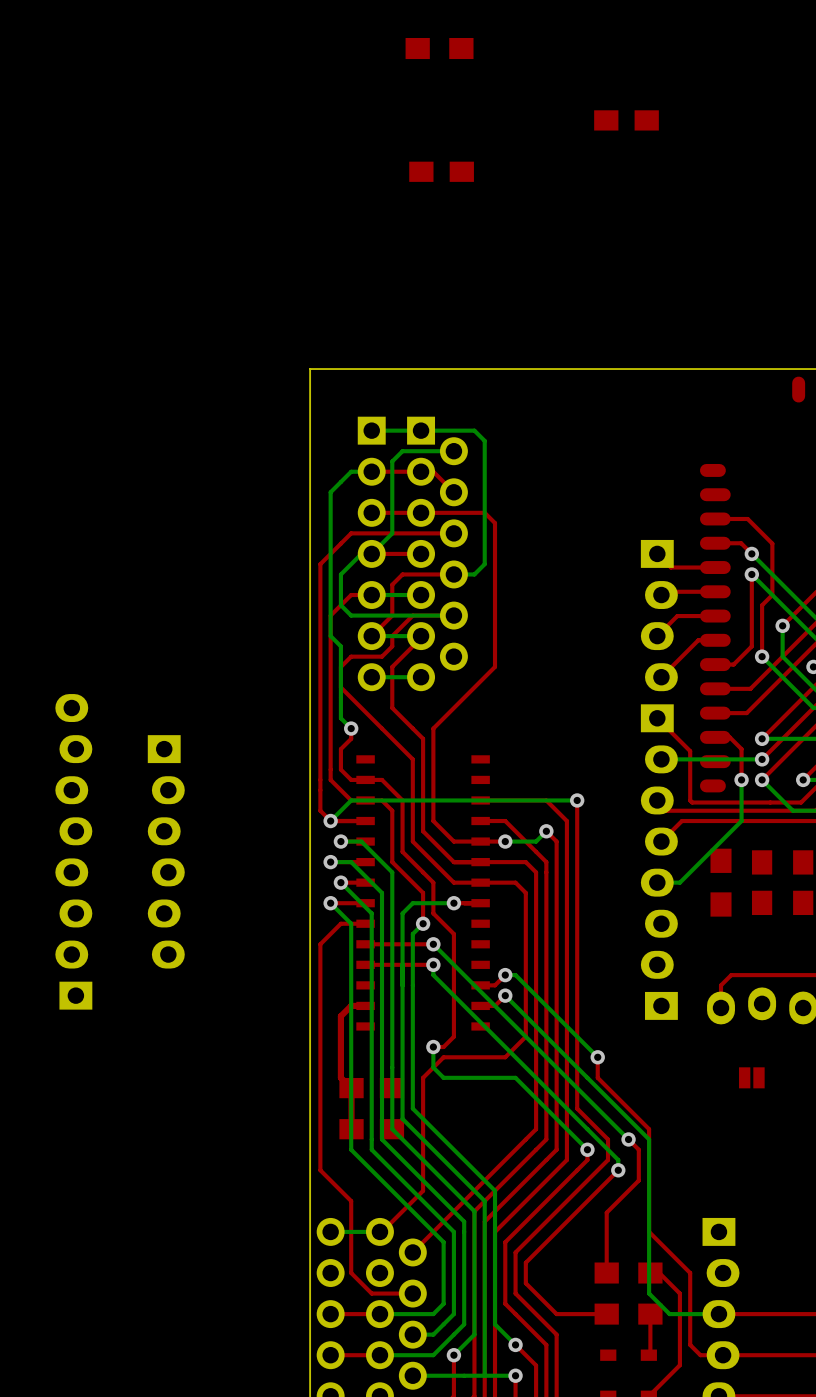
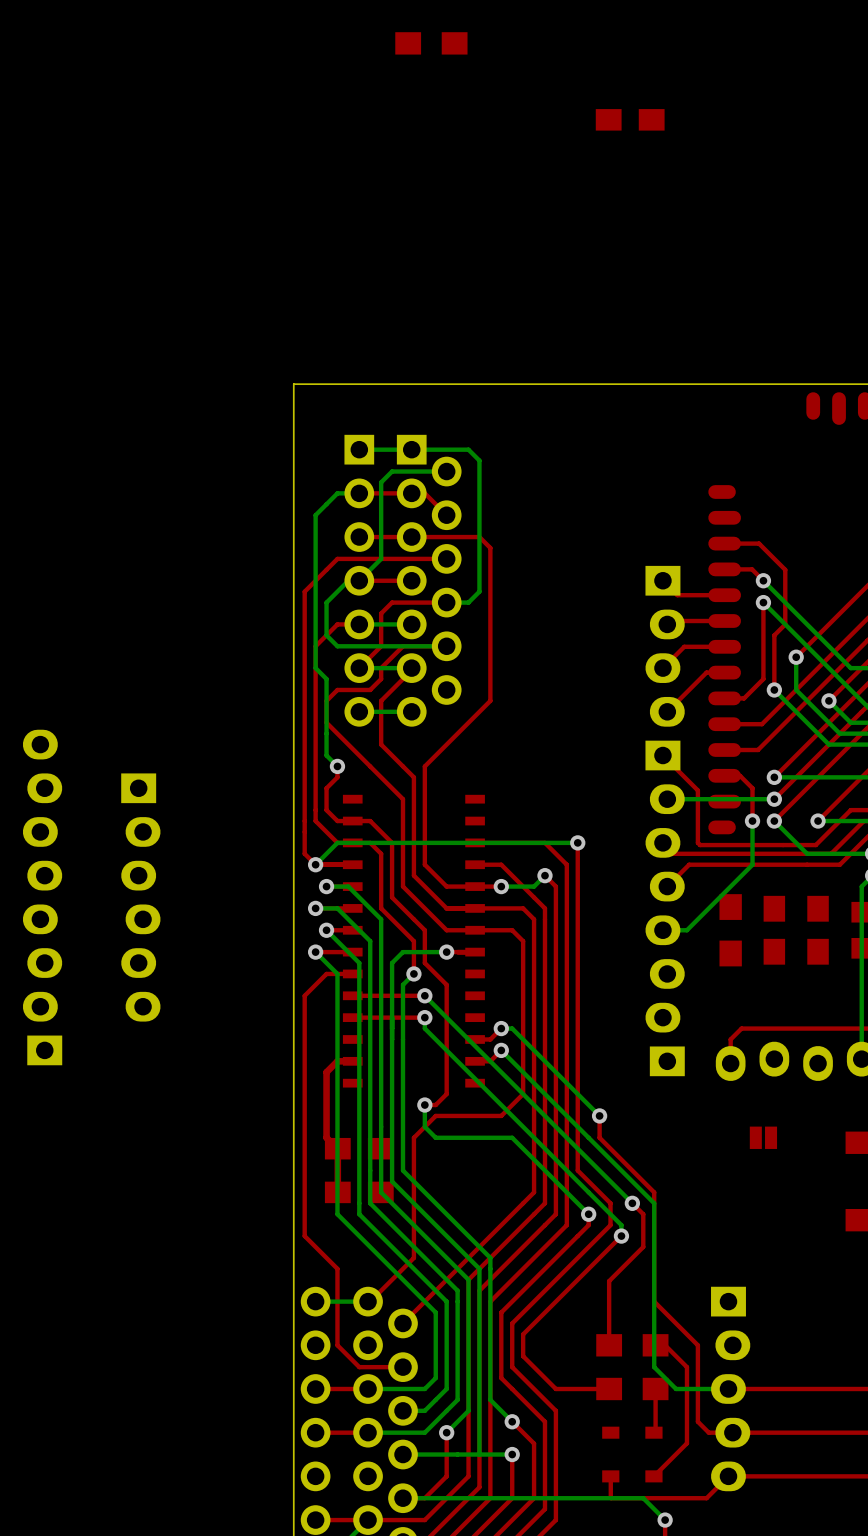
part: (441, 171) -> none

